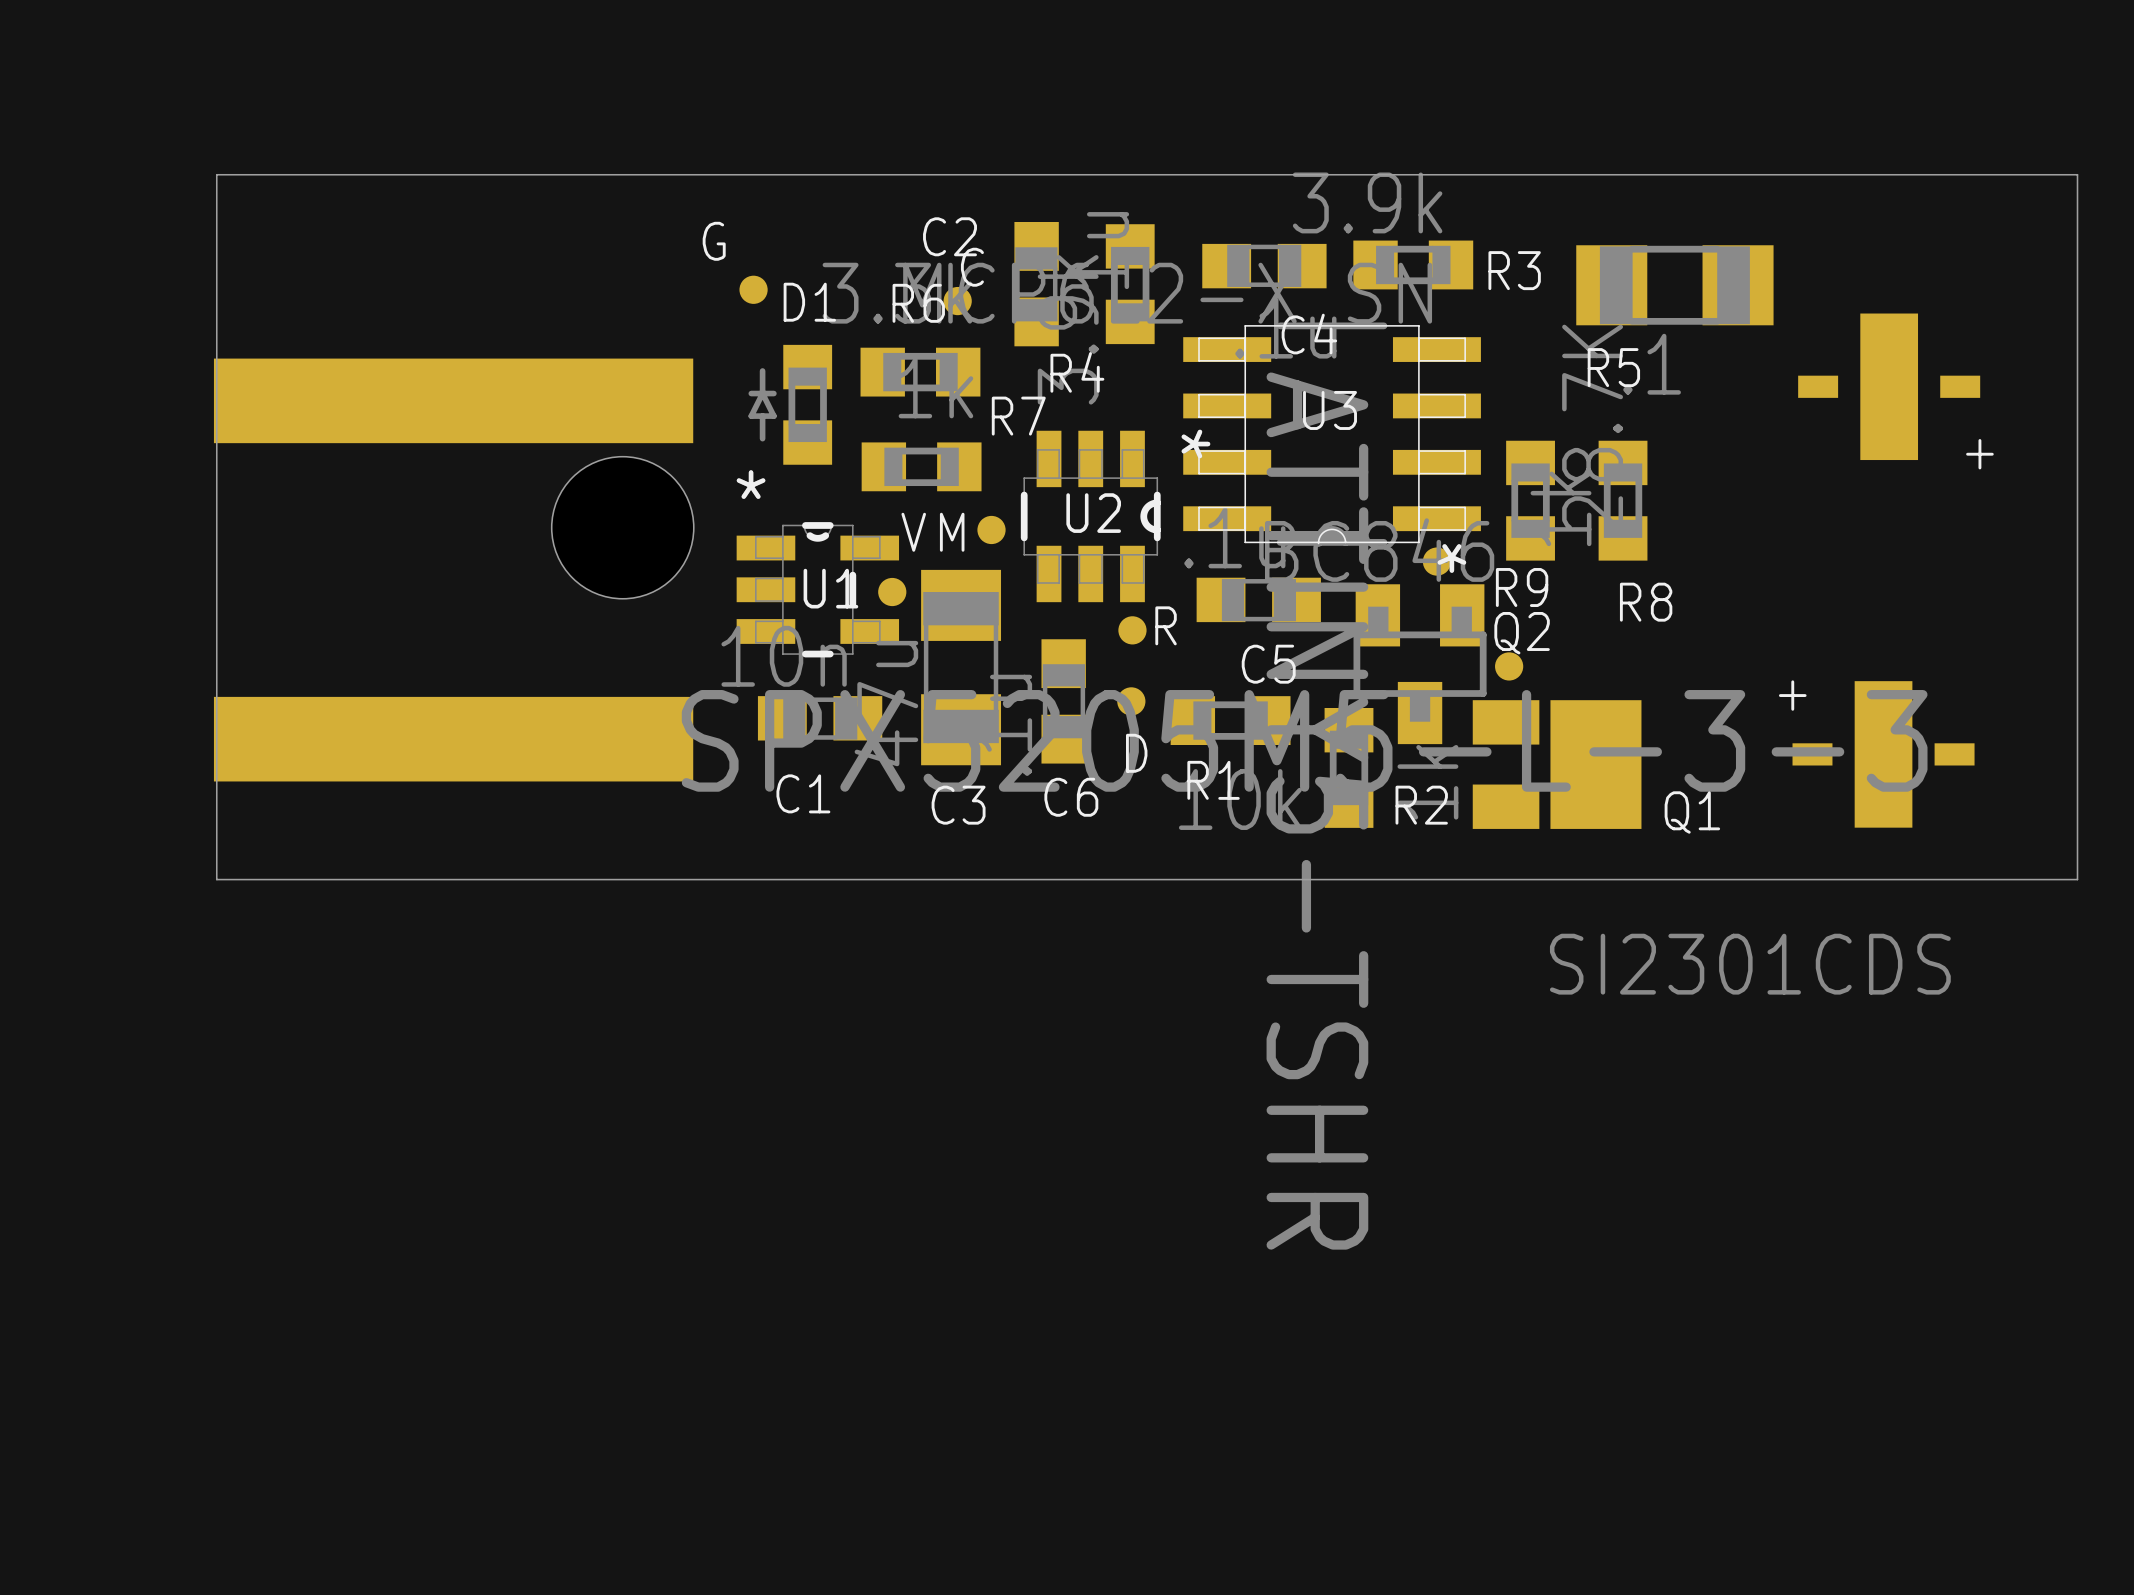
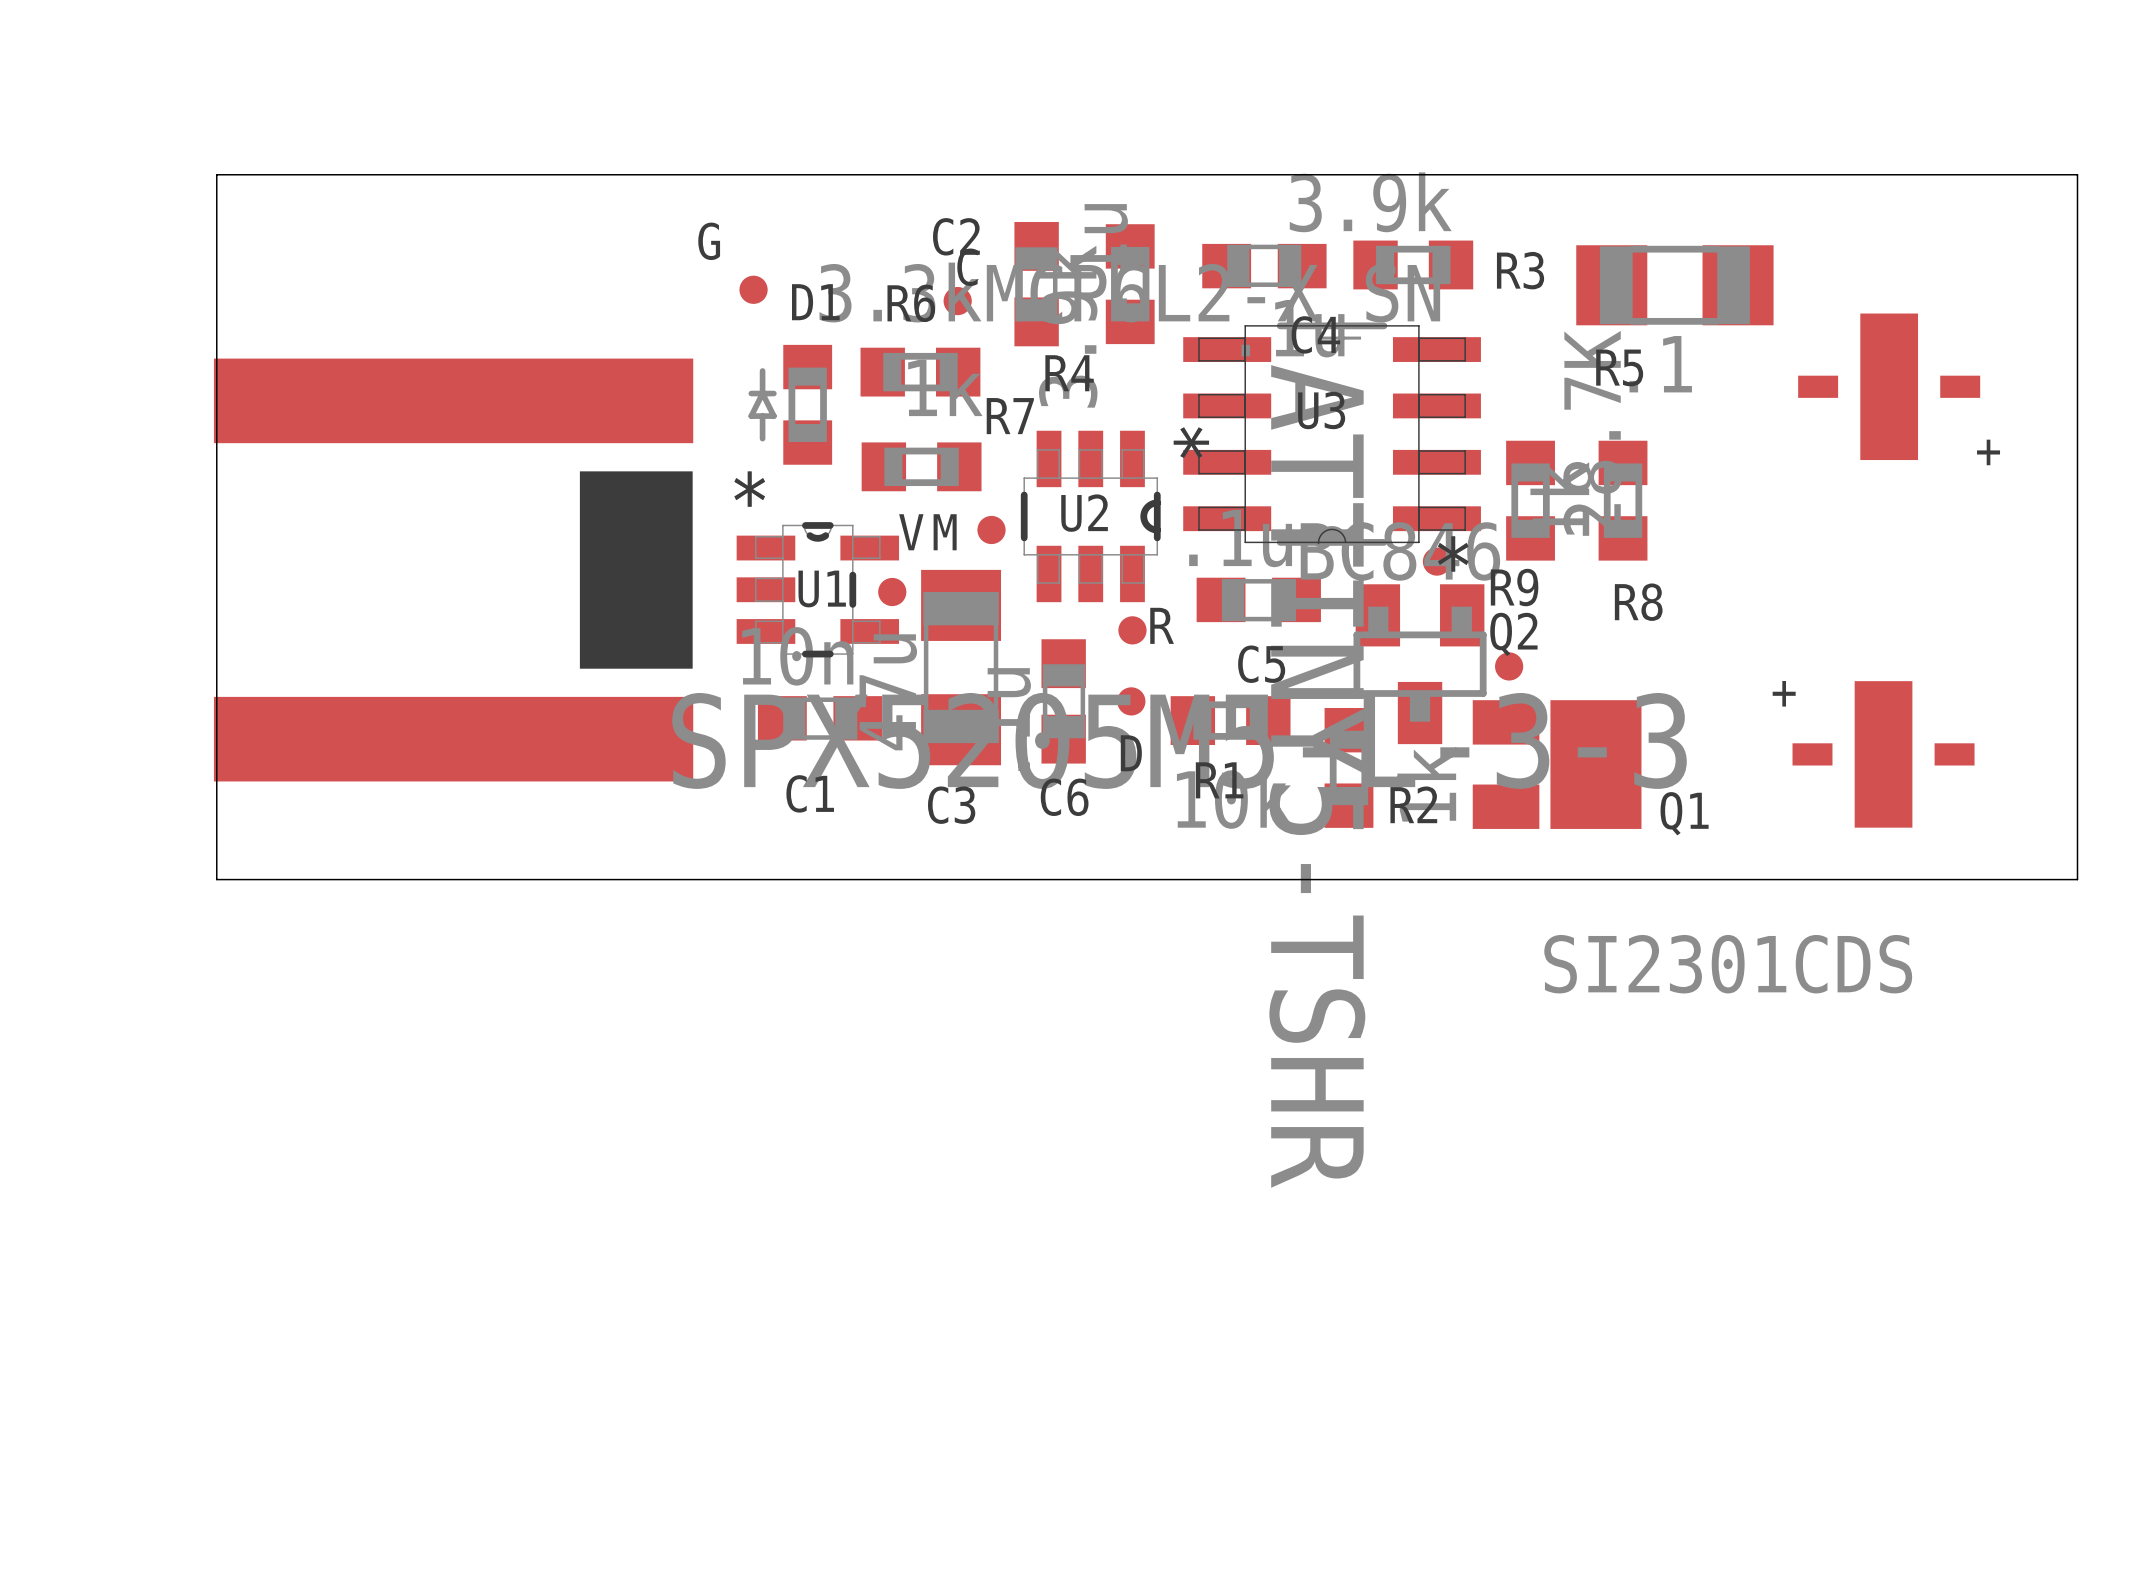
part footprint: [213, 358, 694, 782] -> [213, 358, 694, 782]

